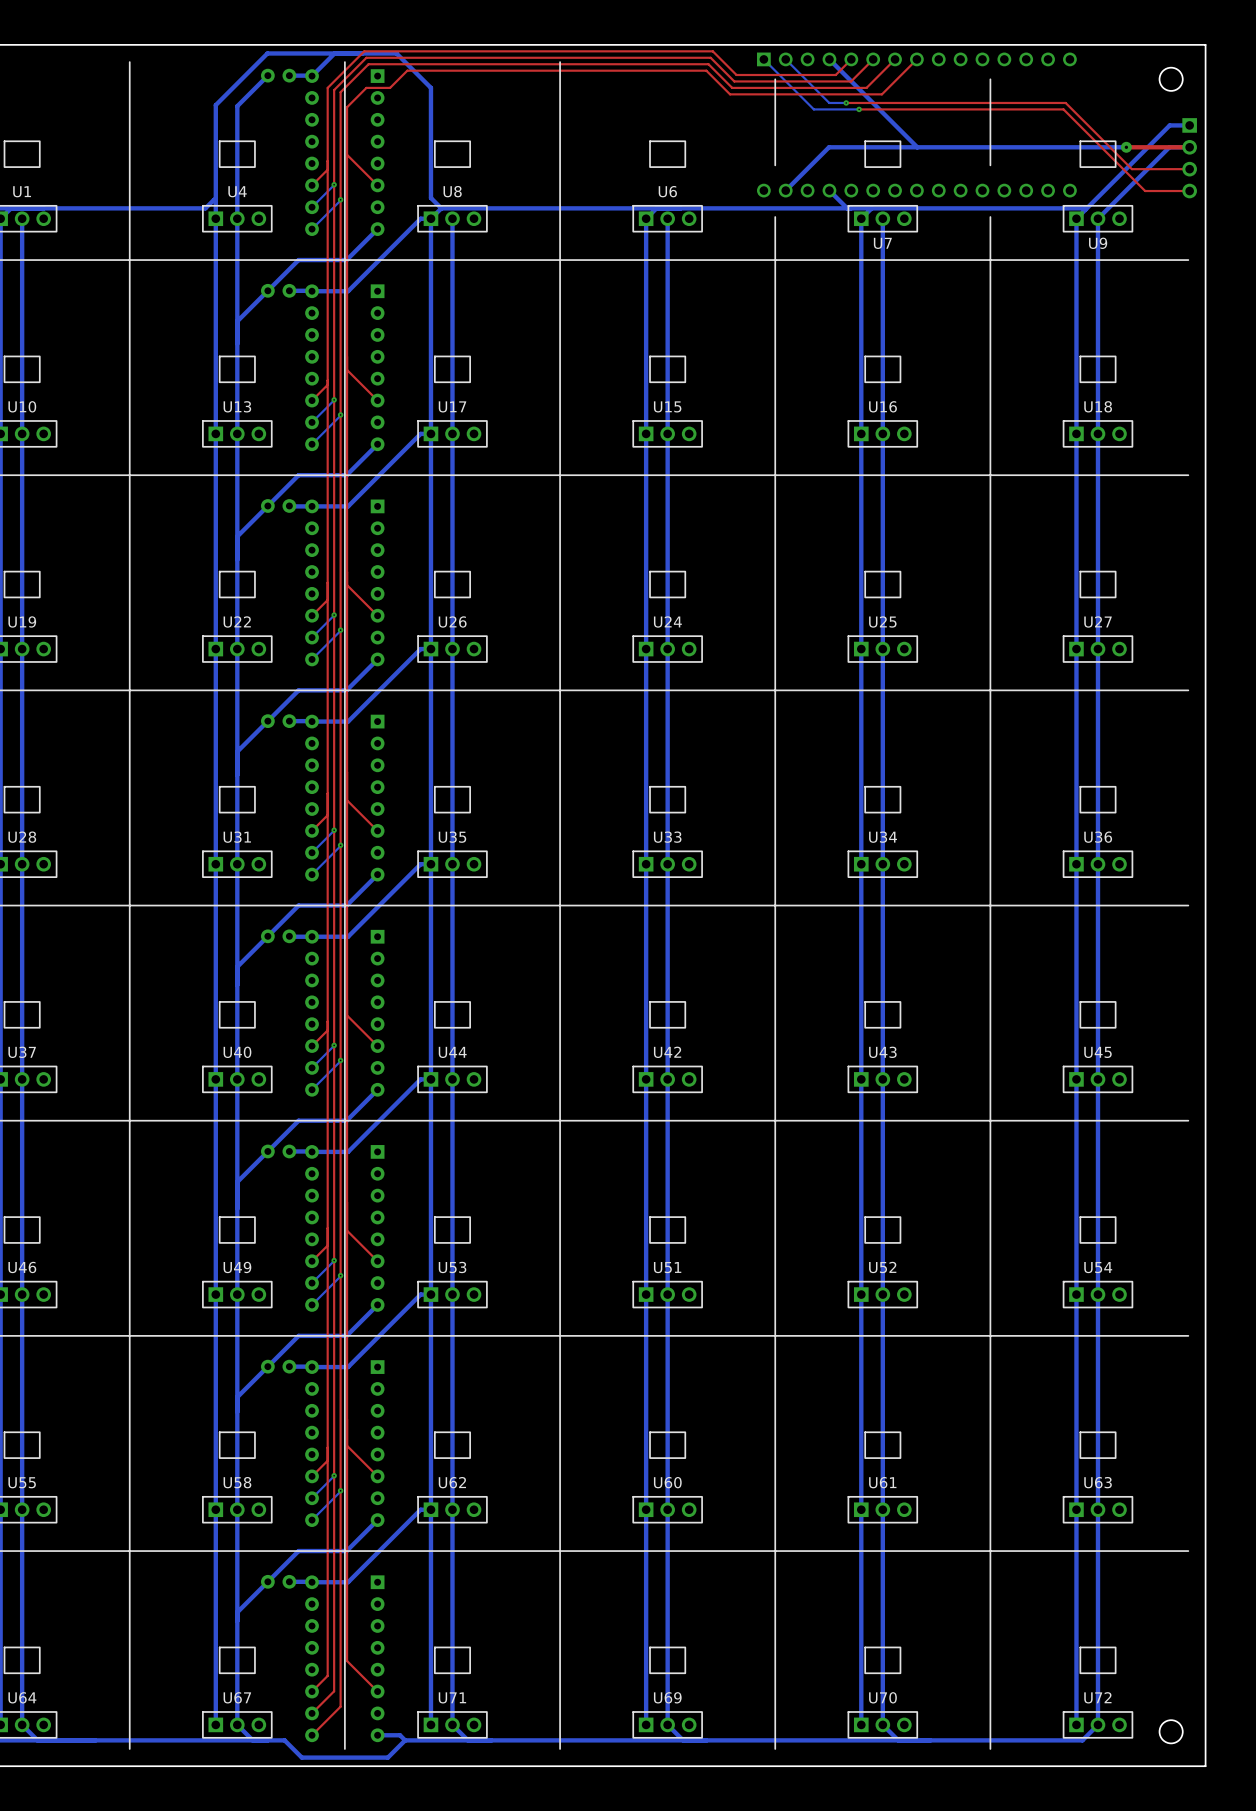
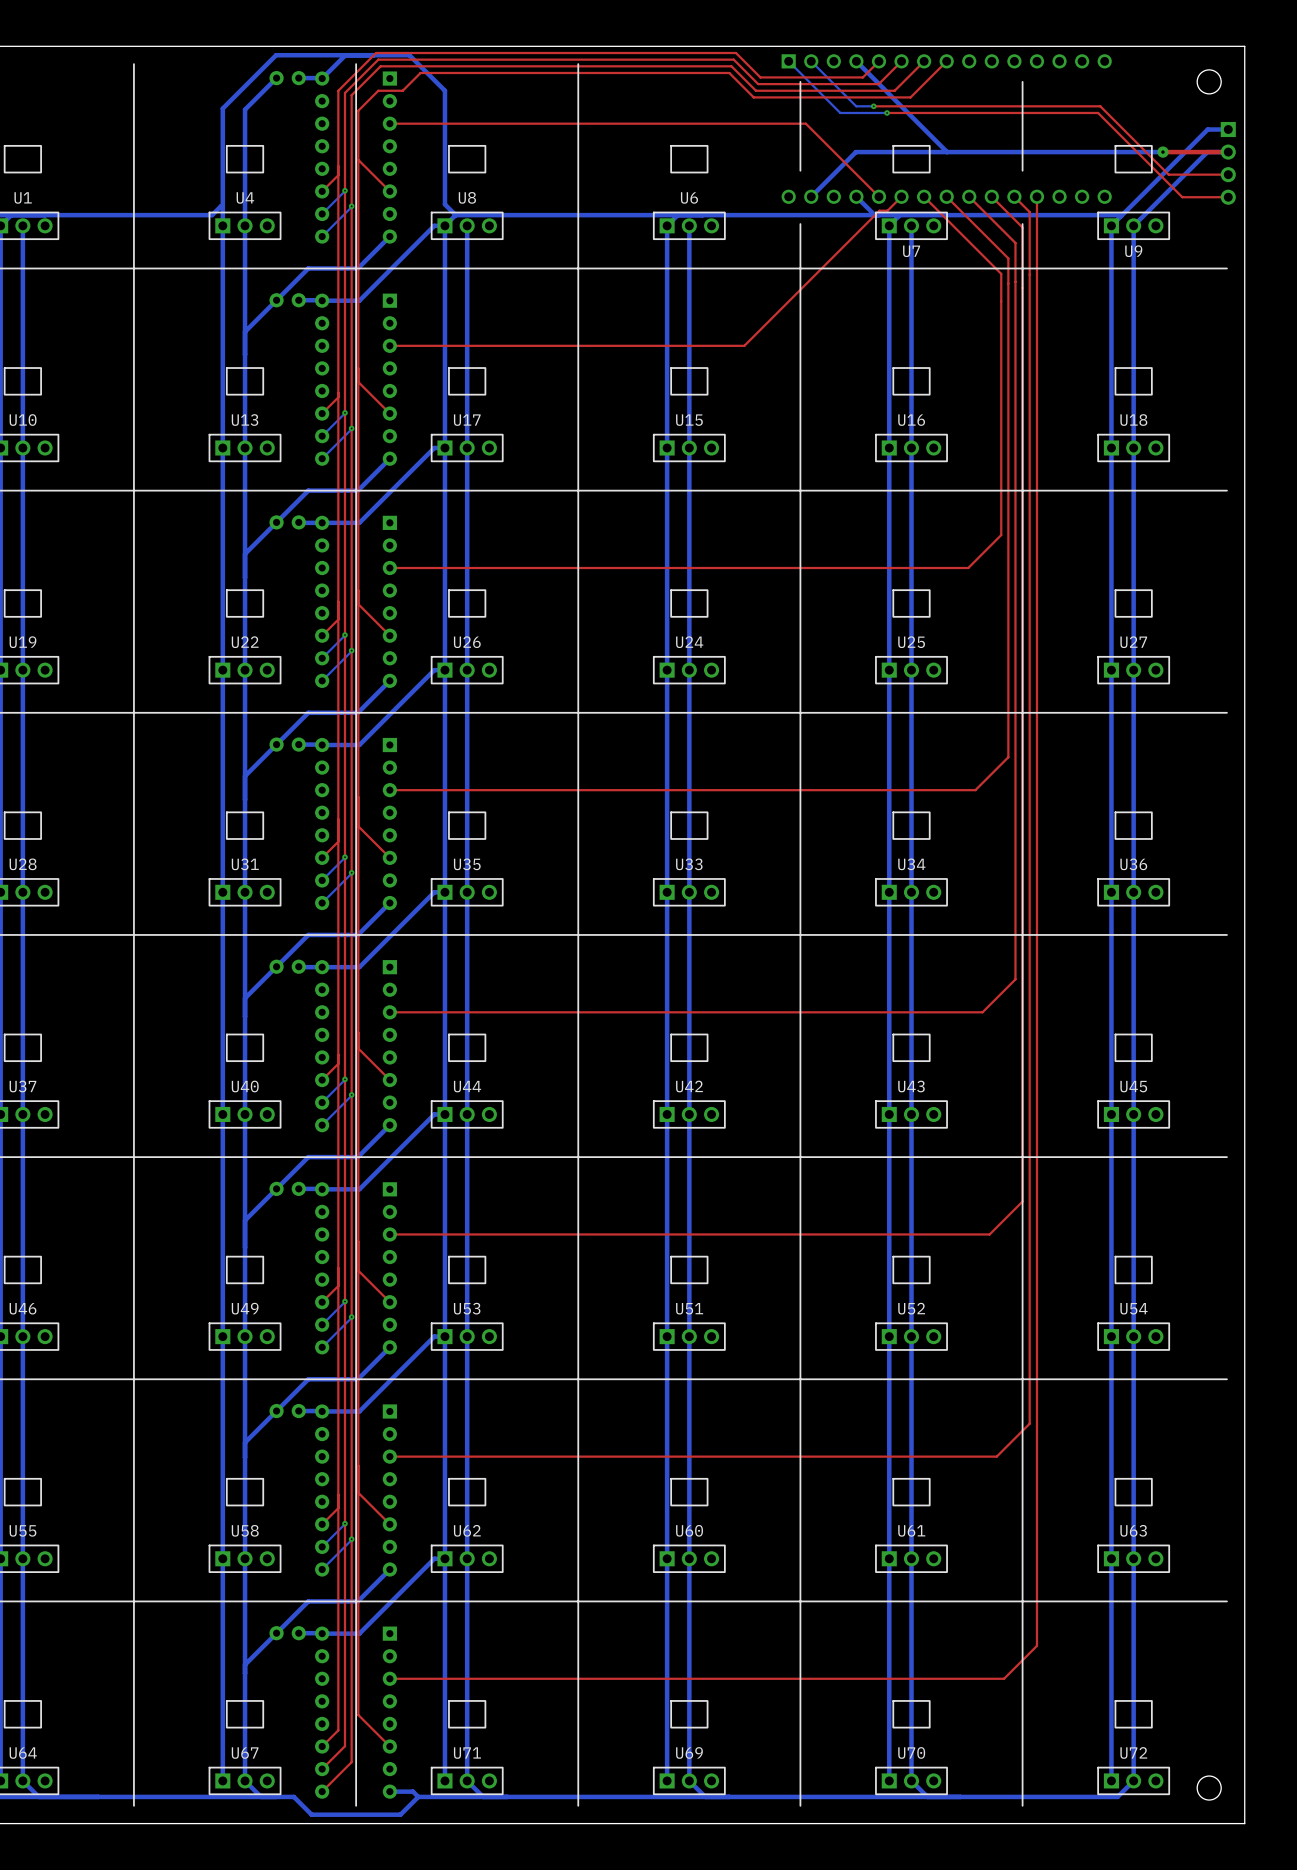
top track: none -> (389, 123) (805, 123) (878, 196)
top track: none -> (901, 196) (887, 210) (879, 210) (744, 345) (389, 345)
top track: none -> (924, 196) (1001, 273) (1001, 535) (968, 568) (389, 568)
top track: none -> (946, 196) (1008, 258) (1008, 757) (975, 790) (389, 790)
top track: none -> (969, 196) (1015, 242) (1015, 979) (982, 1012) (389, 1012)
top track: none -> (991, 196) (1022, 227) (1022, 1201) (989, 1234) (389, 1234)
top track: none -> (1014, 196) (1029, 212) (1029, 1423) (996, 1456) (389, 1456)
top track: none -> (1036, 196) (1036, 1645) (1004, 1678) (389, 1678)

